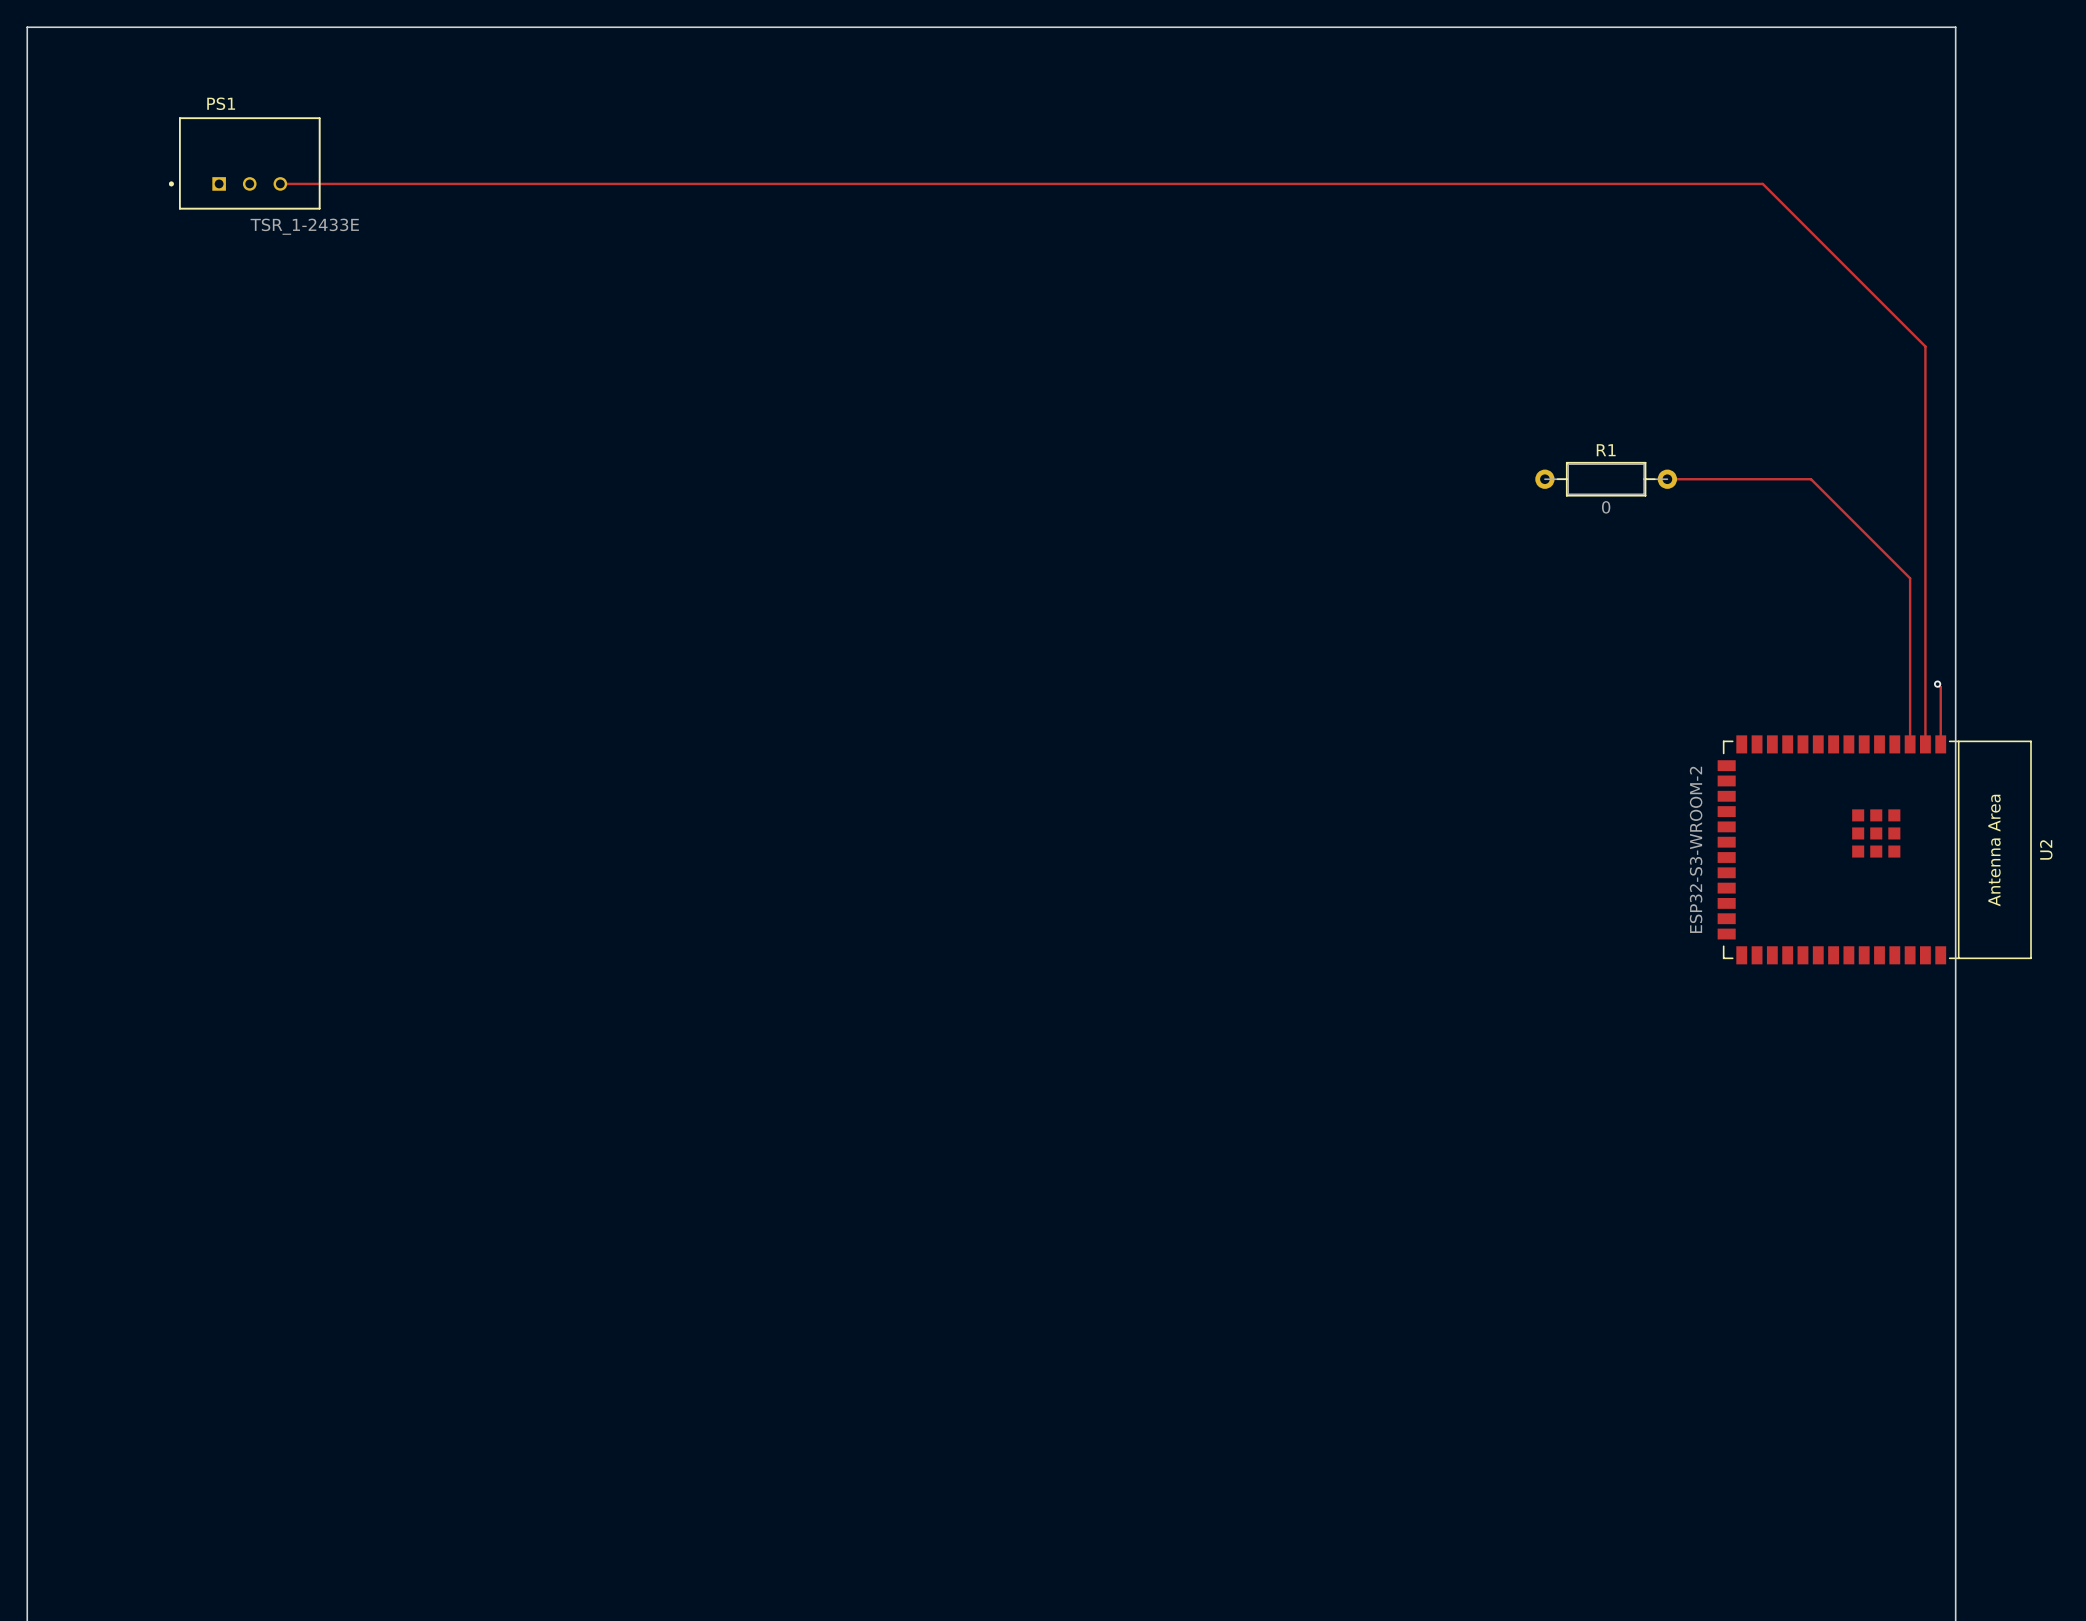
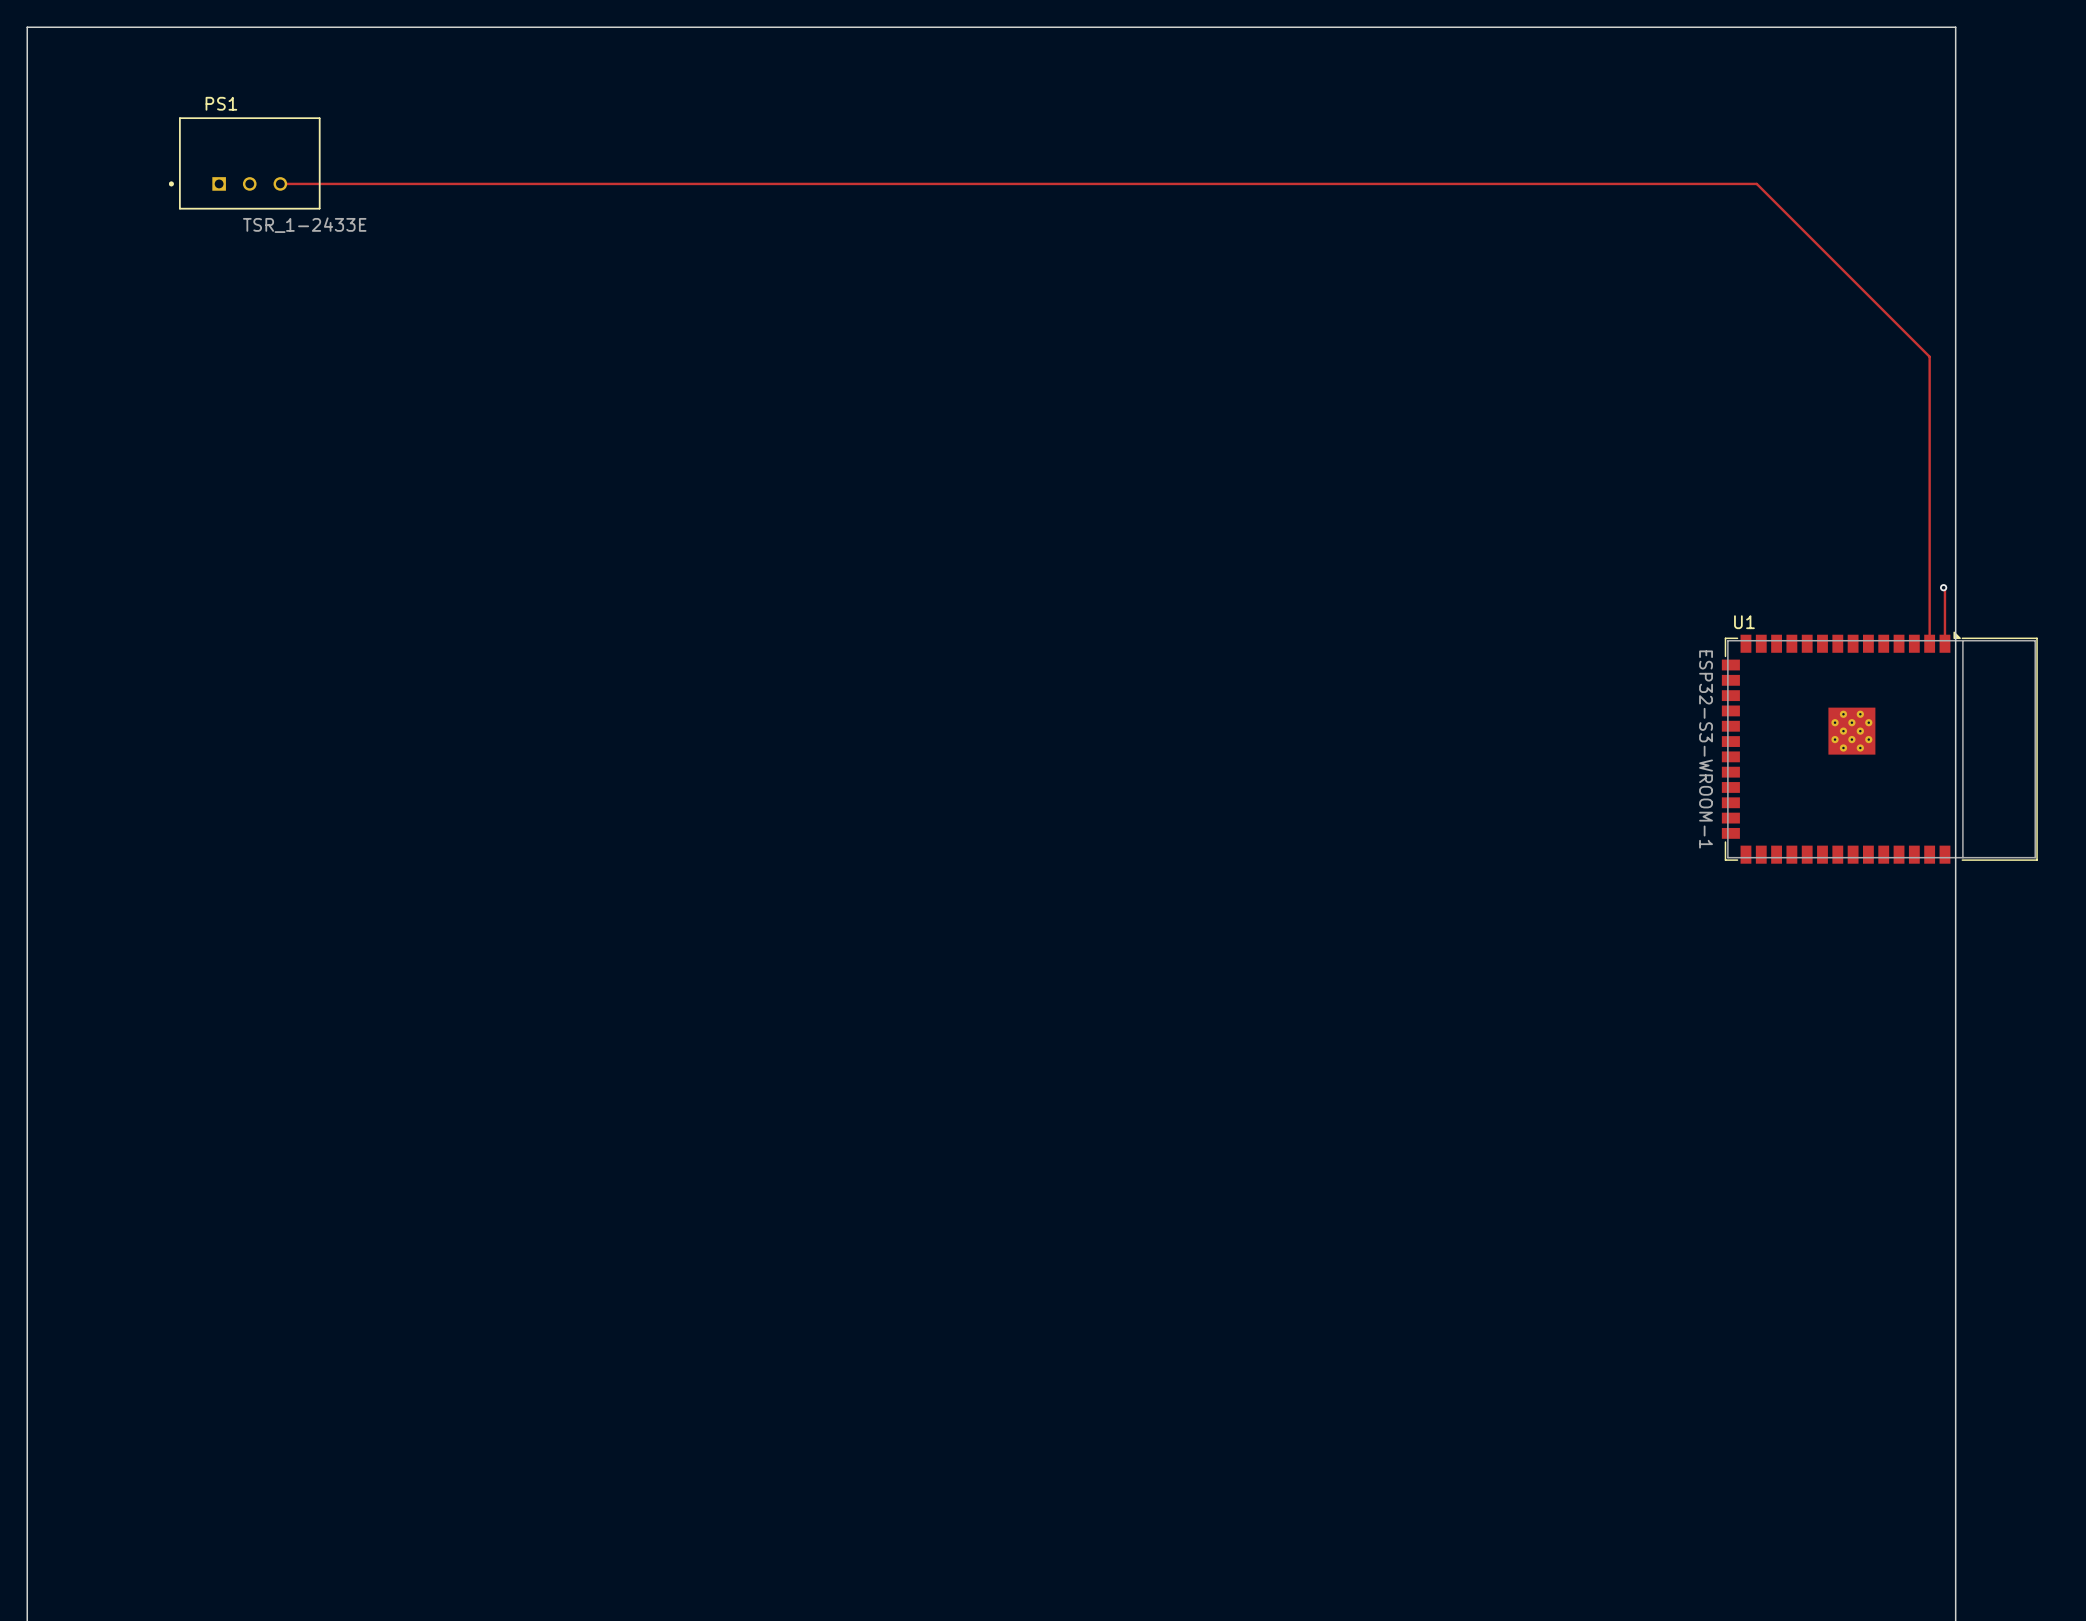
track: (1756, 183) (1762, 183) (1925, 346) (1925, 744) -> (1756, 183) (1929, 356) (1929, 643)
R1: 0 (1606, 479) -> none
track: (1667, 479) (1811, 479) (1910, 578) (1910, 744) -> none
track: none -> (1943, 587) (1944, 643)
via: none -> (1943, 587)
track: (1937, 684) (1940, 687) (1940, 744) -> none
via: (1937, 684) -> none
U1: none -> ESP32-S3-WROOM-1 (1879, 747)
U2: ESP32-S3-WROOM-2 (1874, 849) -> none

